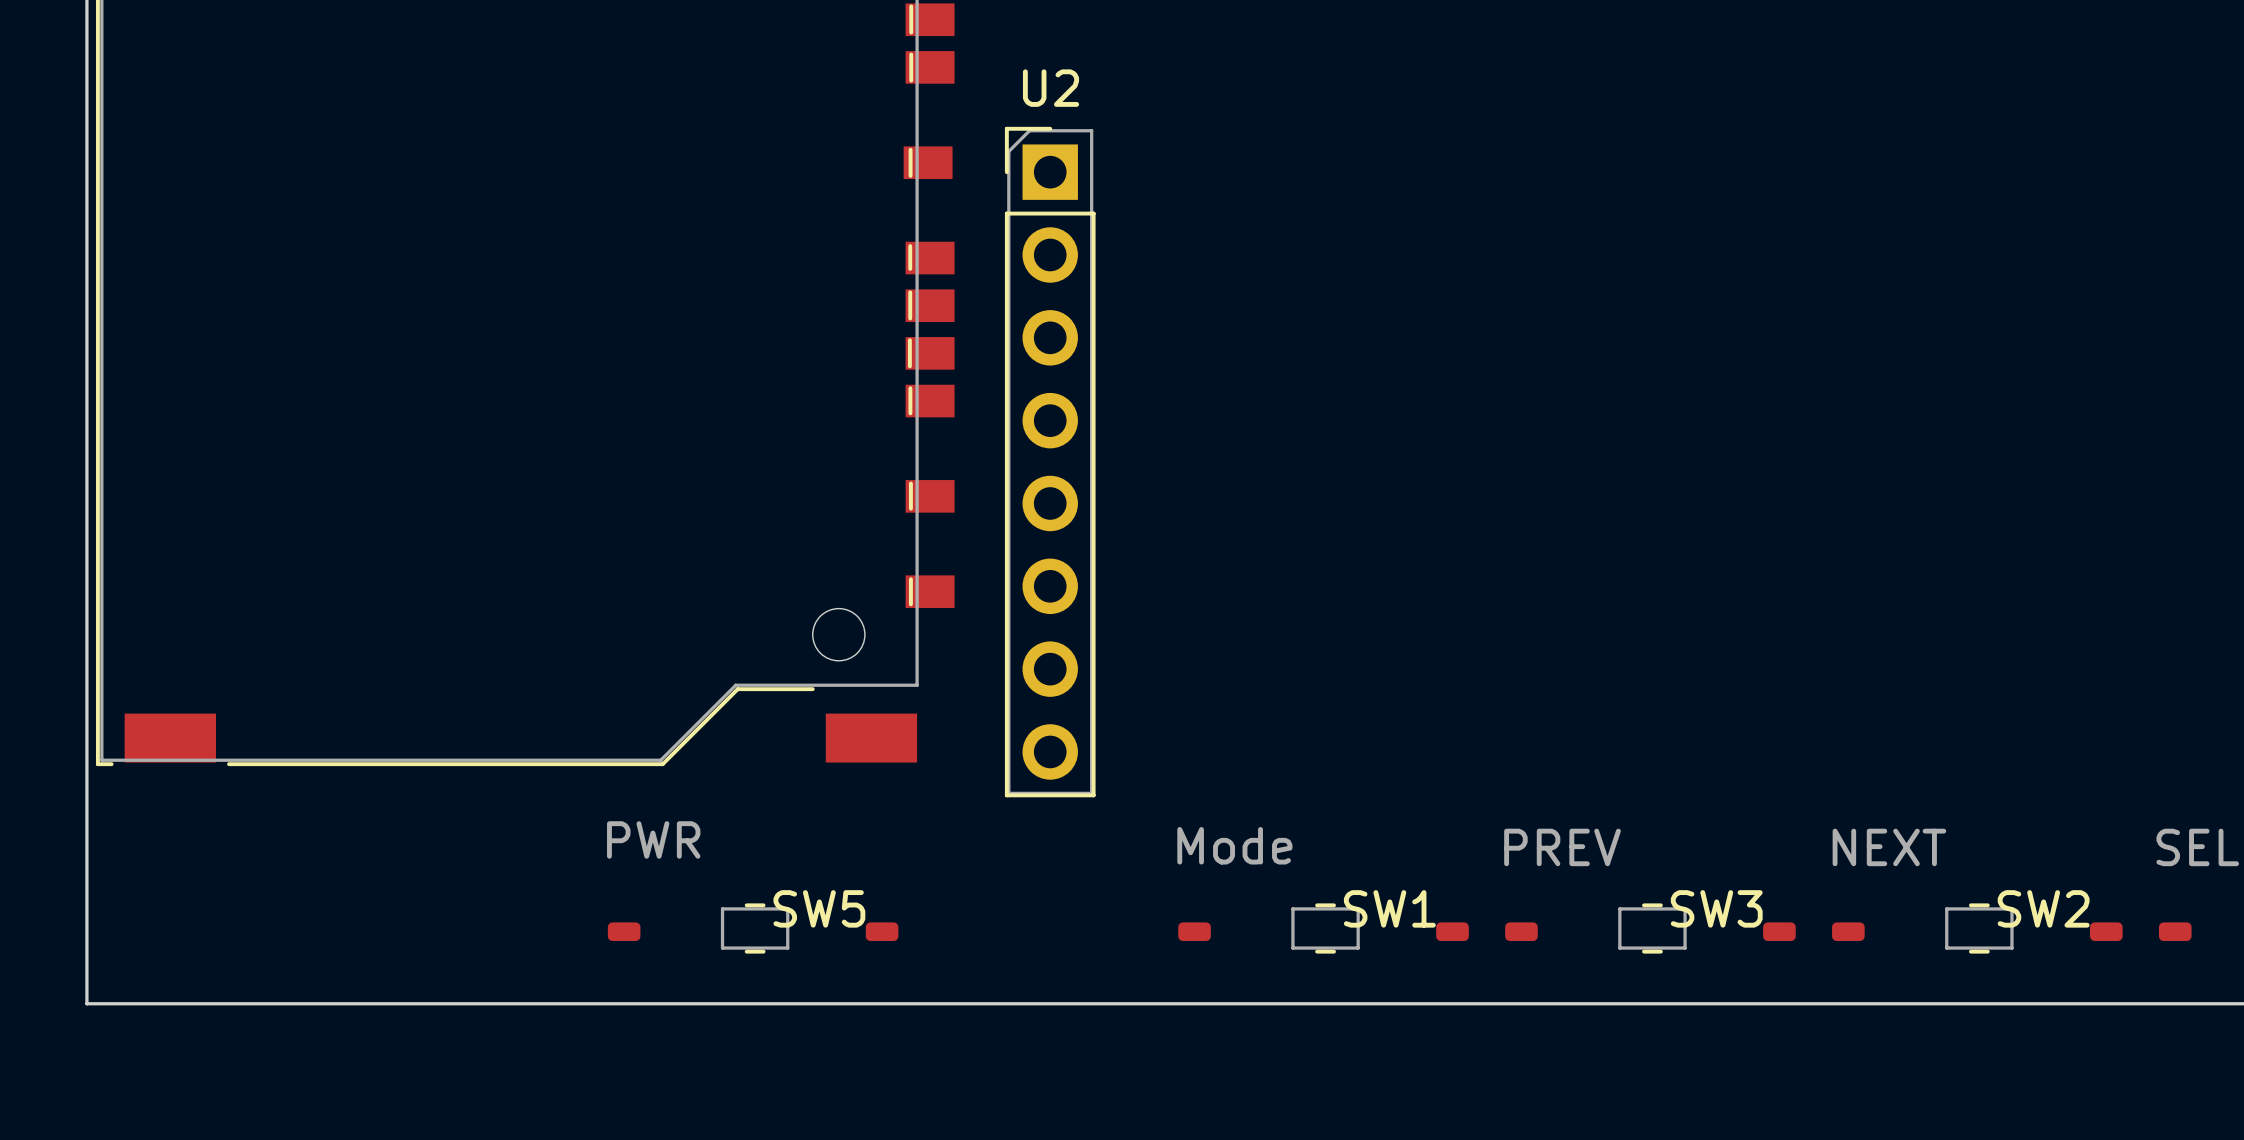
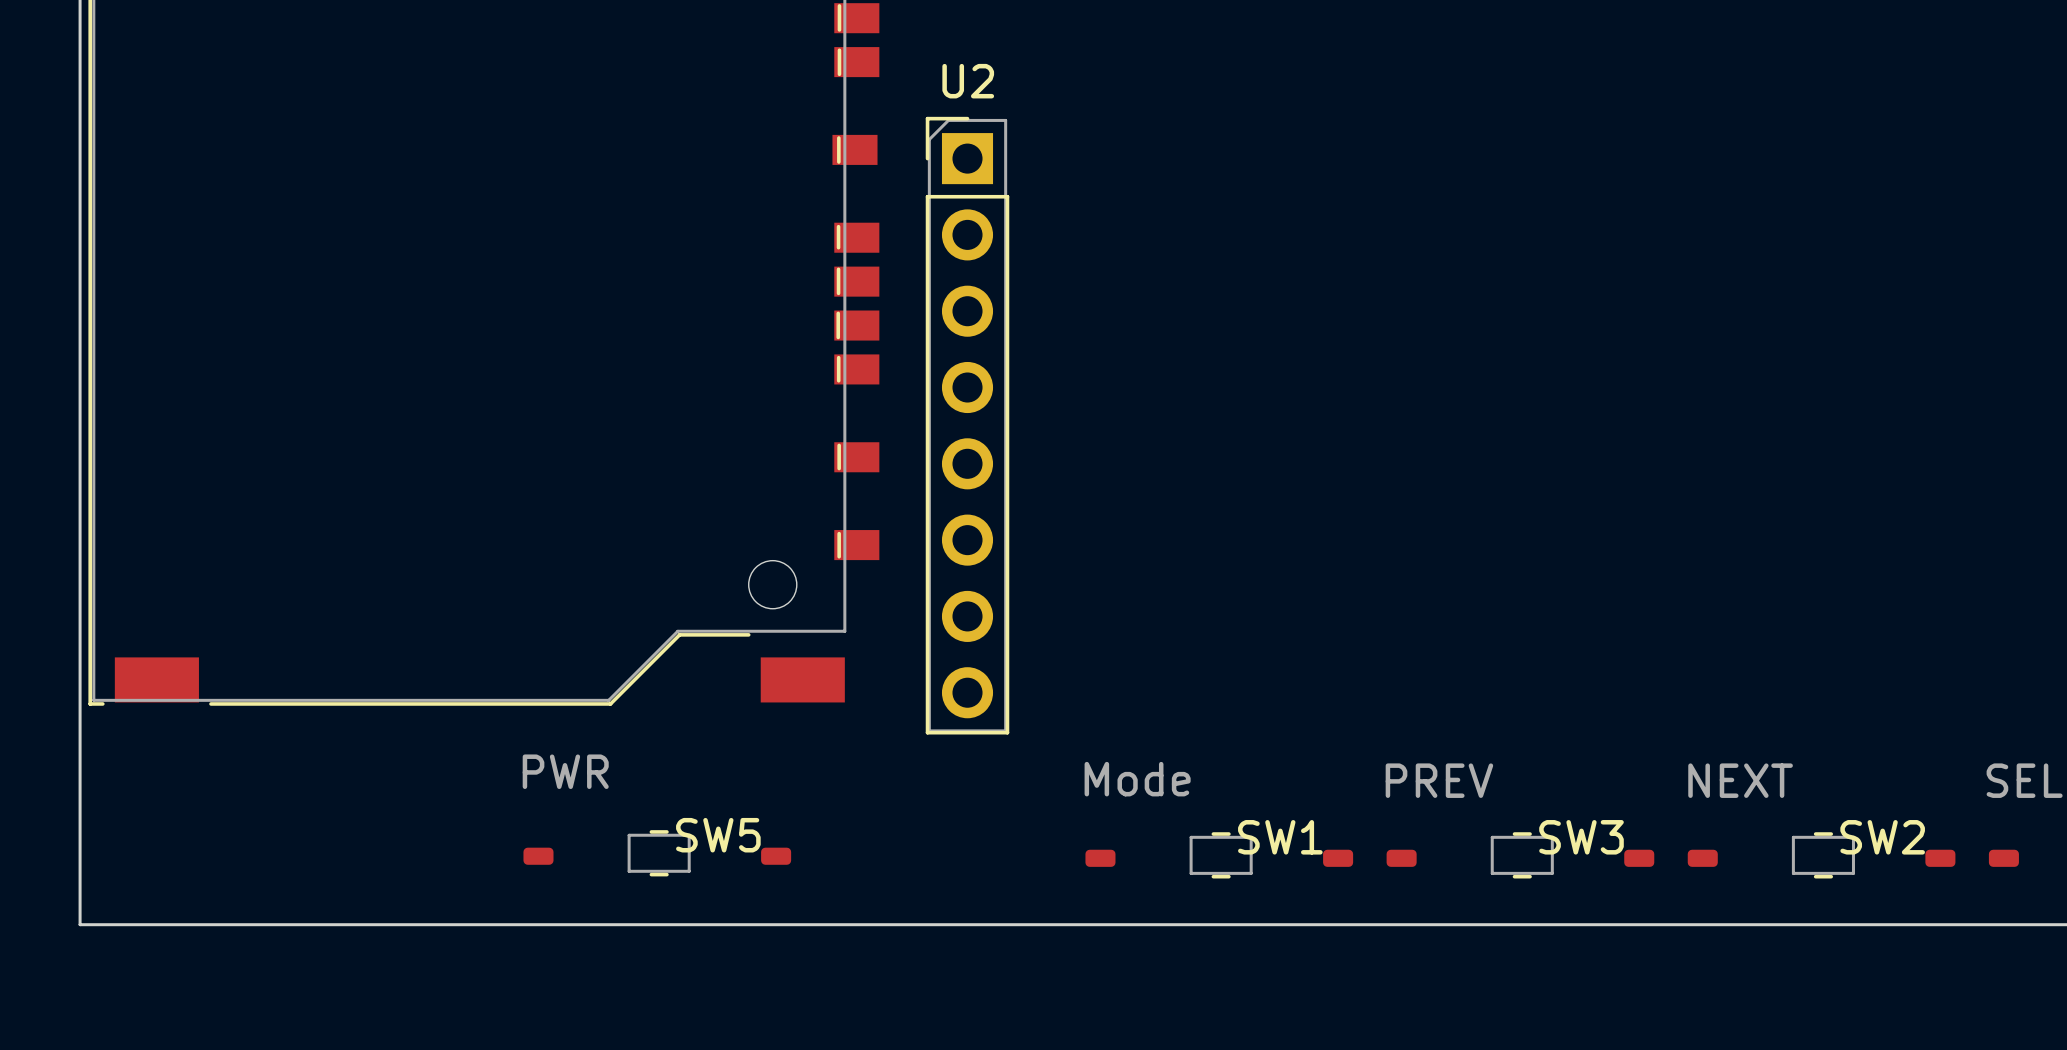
SW5 position: (753, 928) -> (657, 853)

